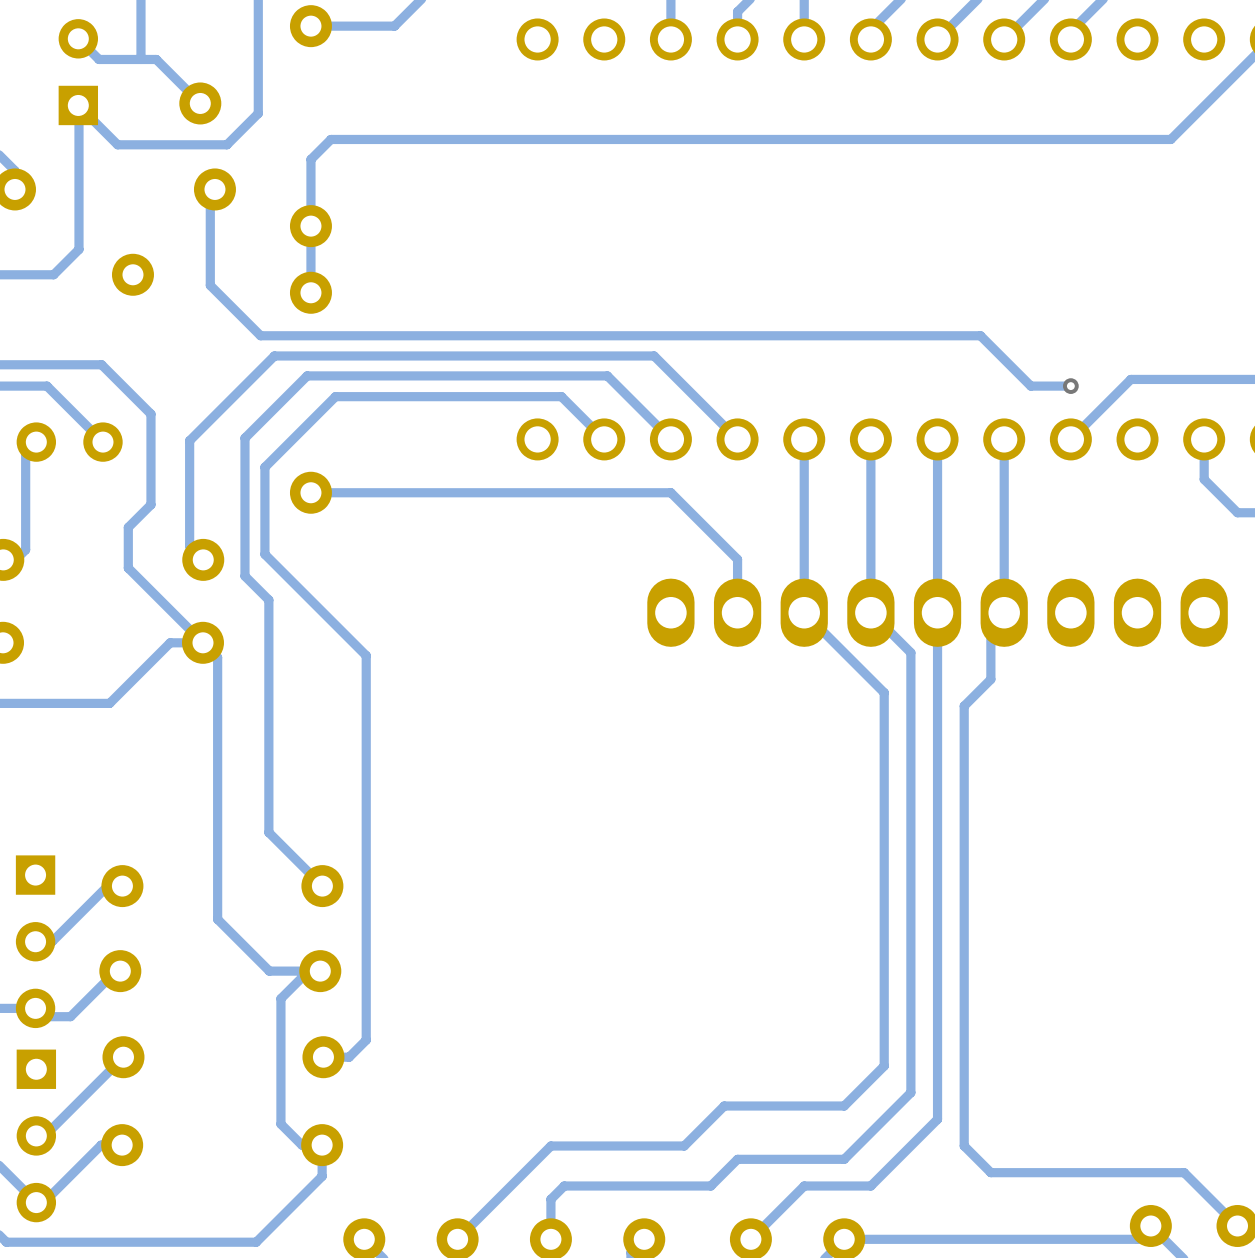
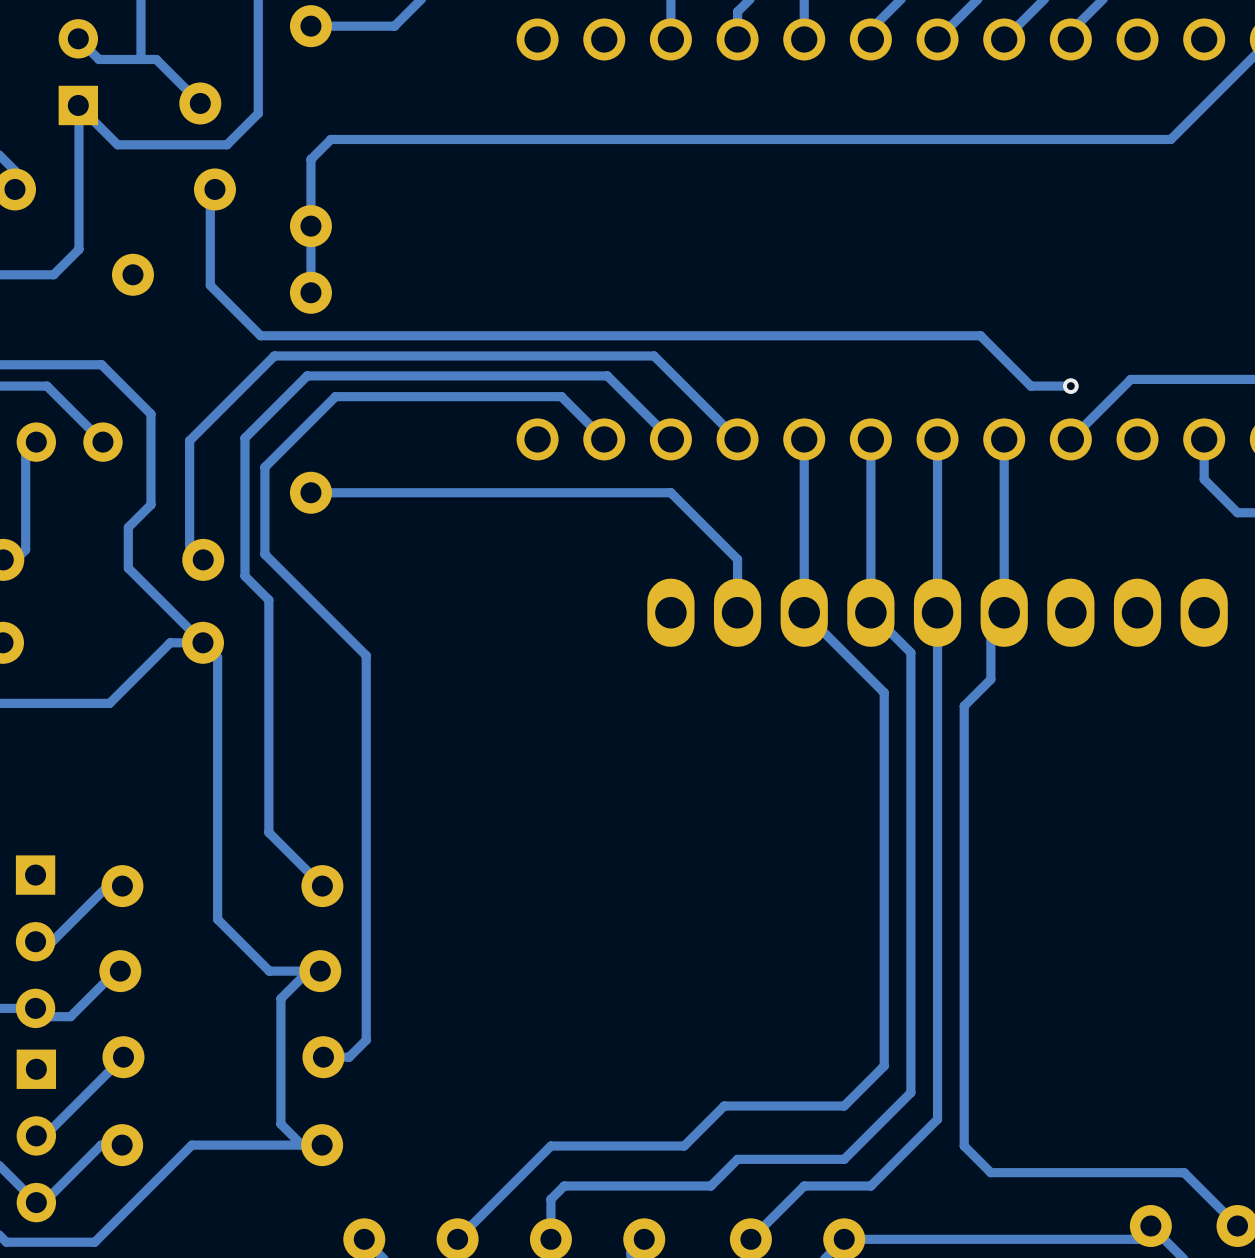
track: (322, 1145) (322, 1176) (256, 1242) (94, 1242) -> (301, 1145) (191, 1145) (94, 1242)

